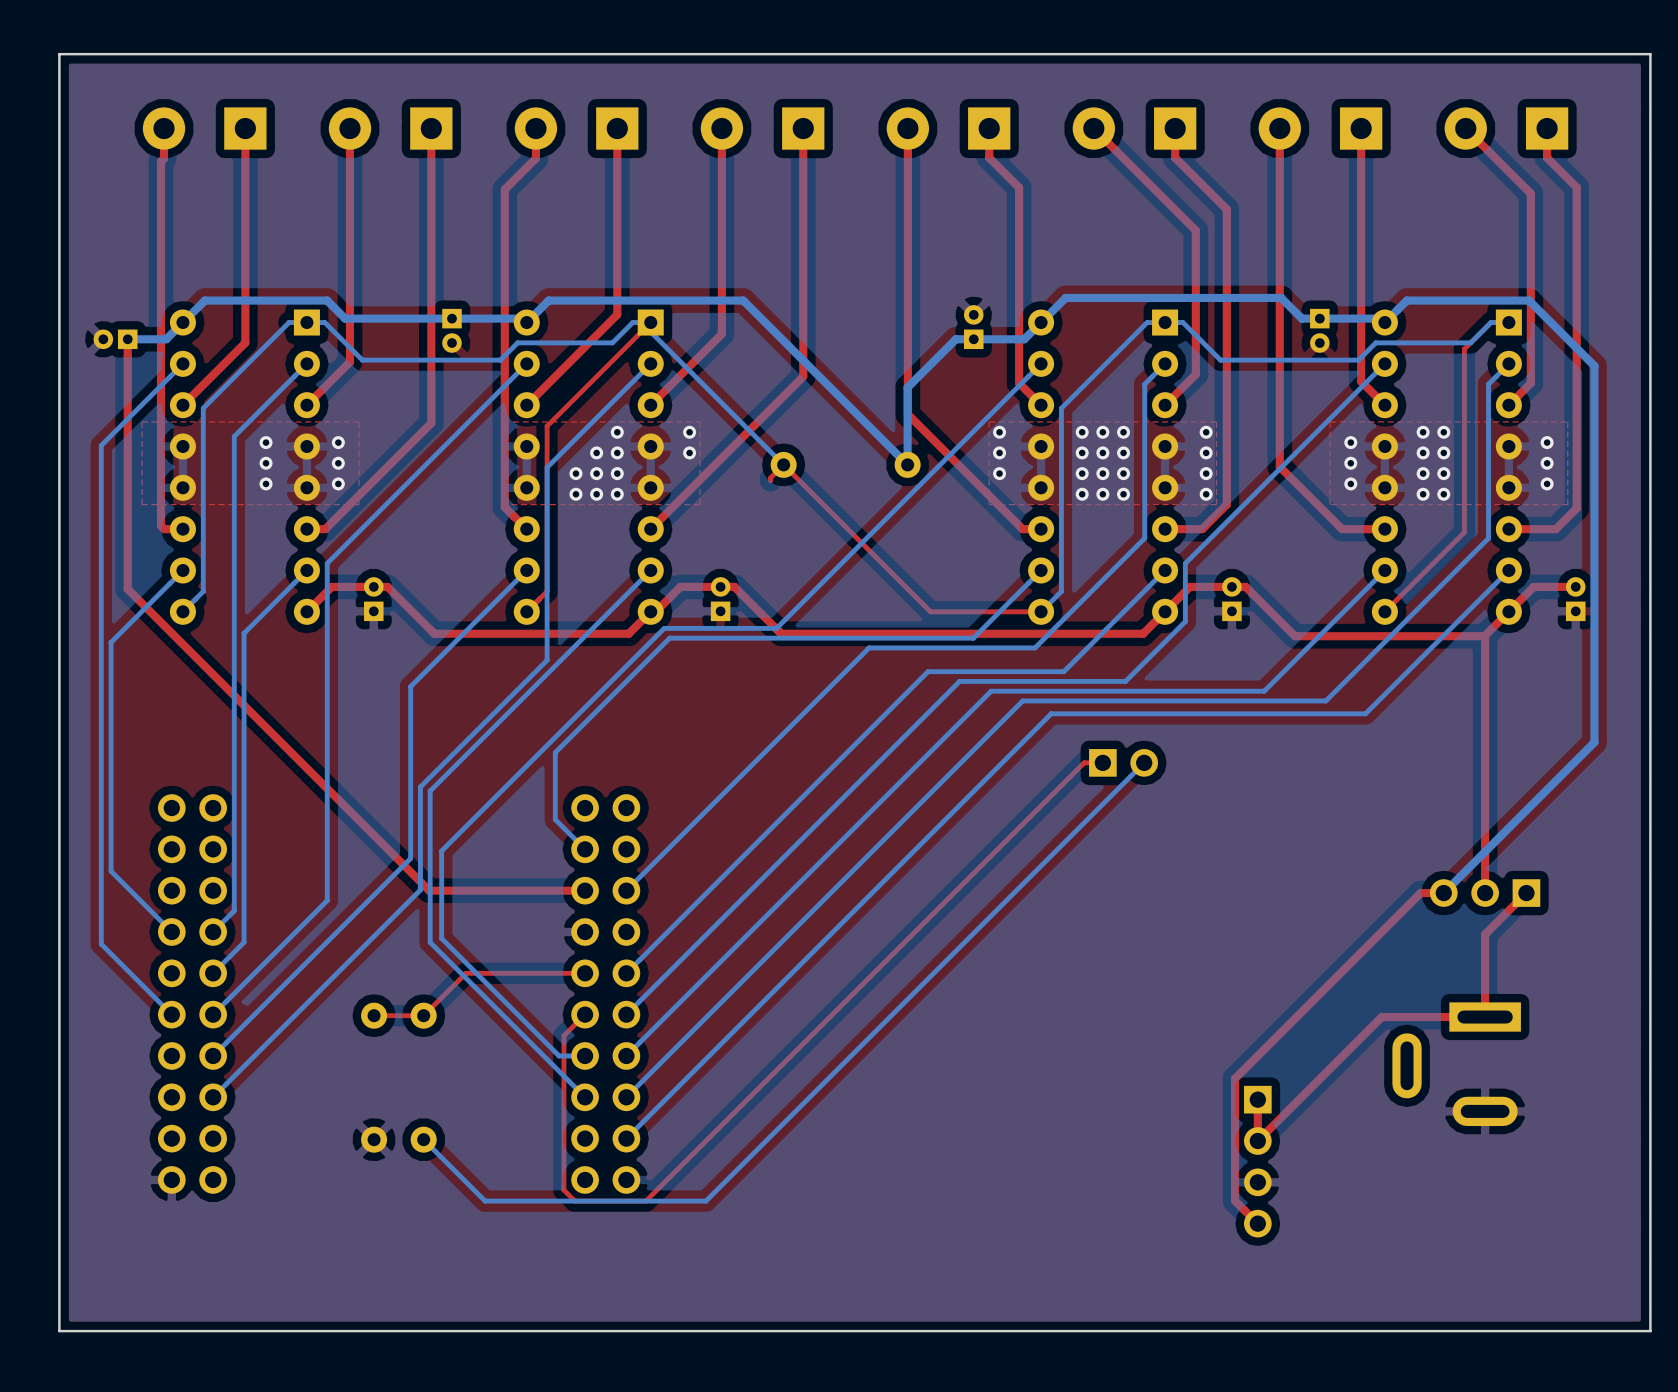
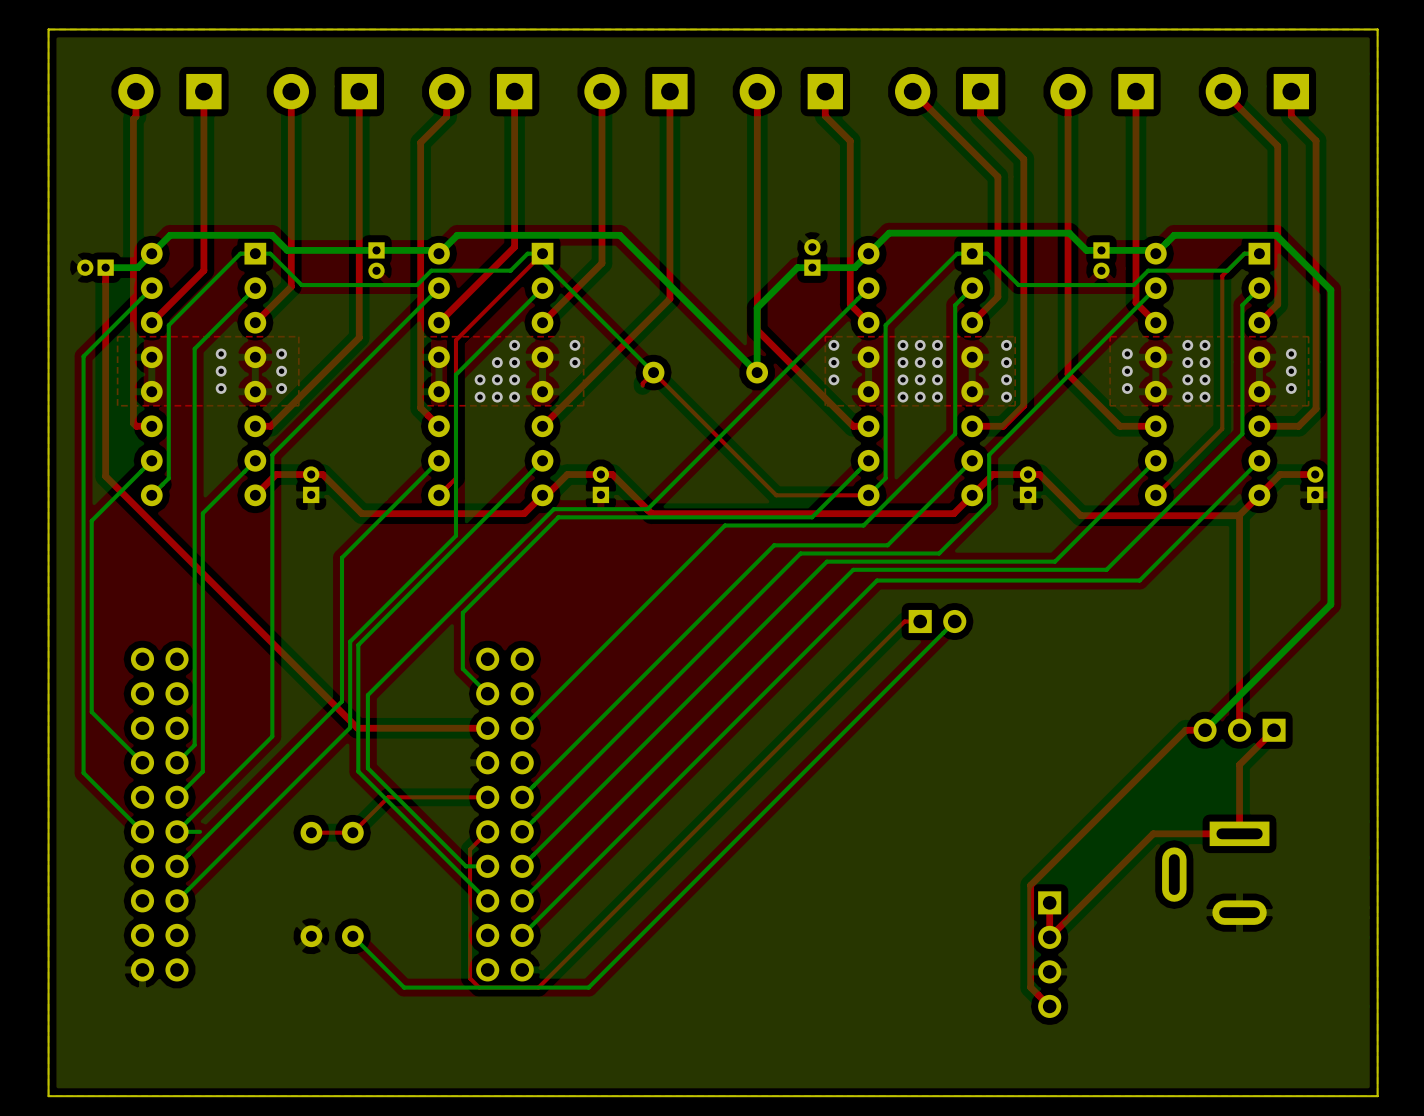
bottom track: none -> (199, 831) (177, 831)

